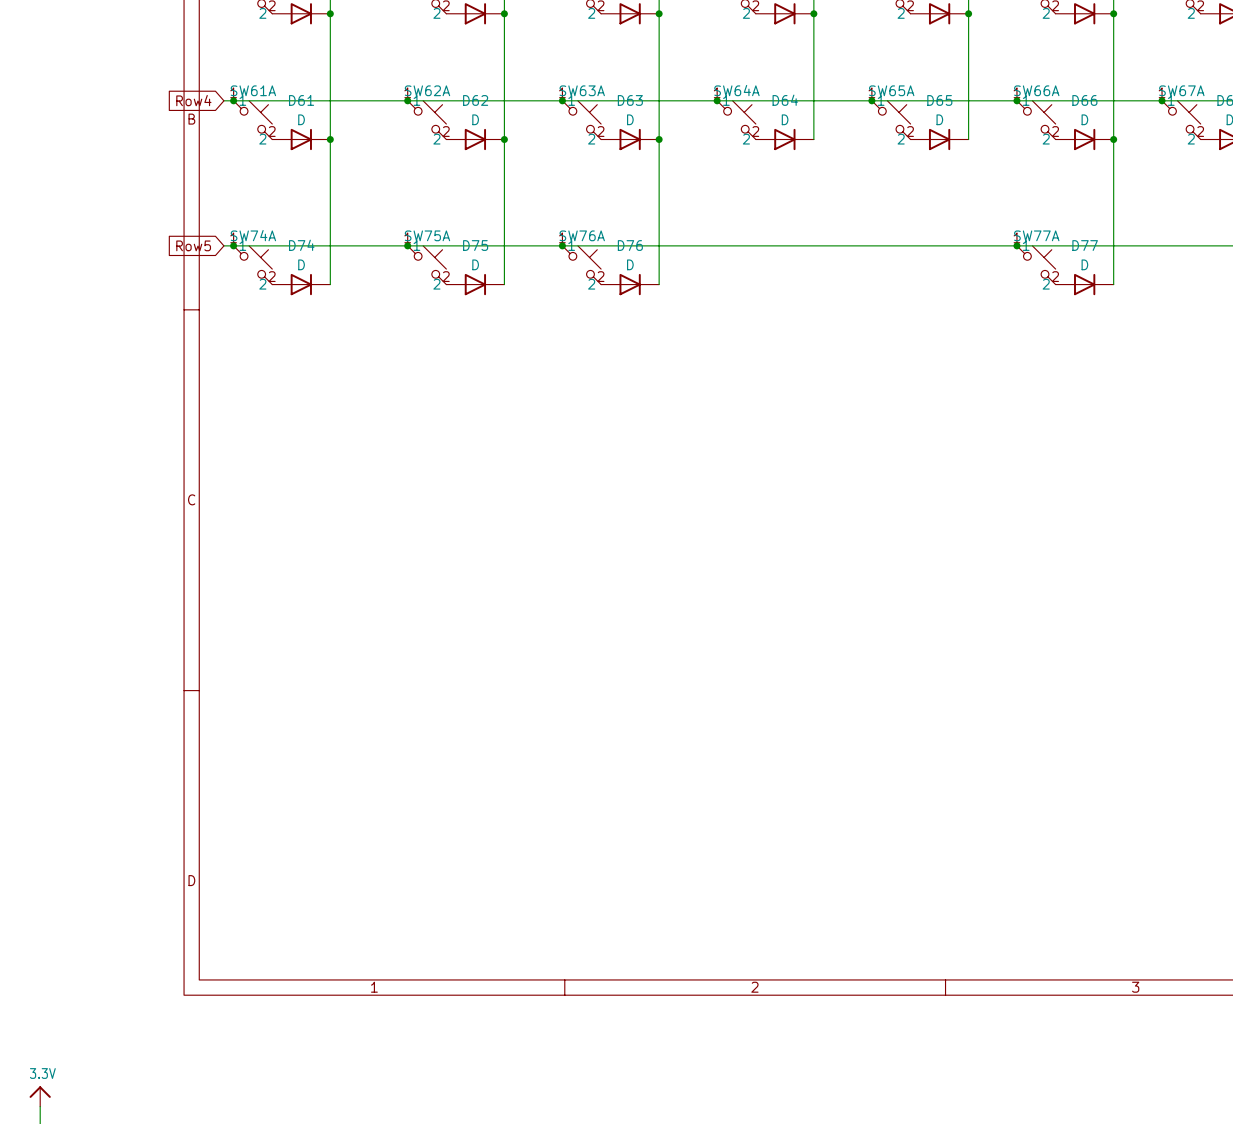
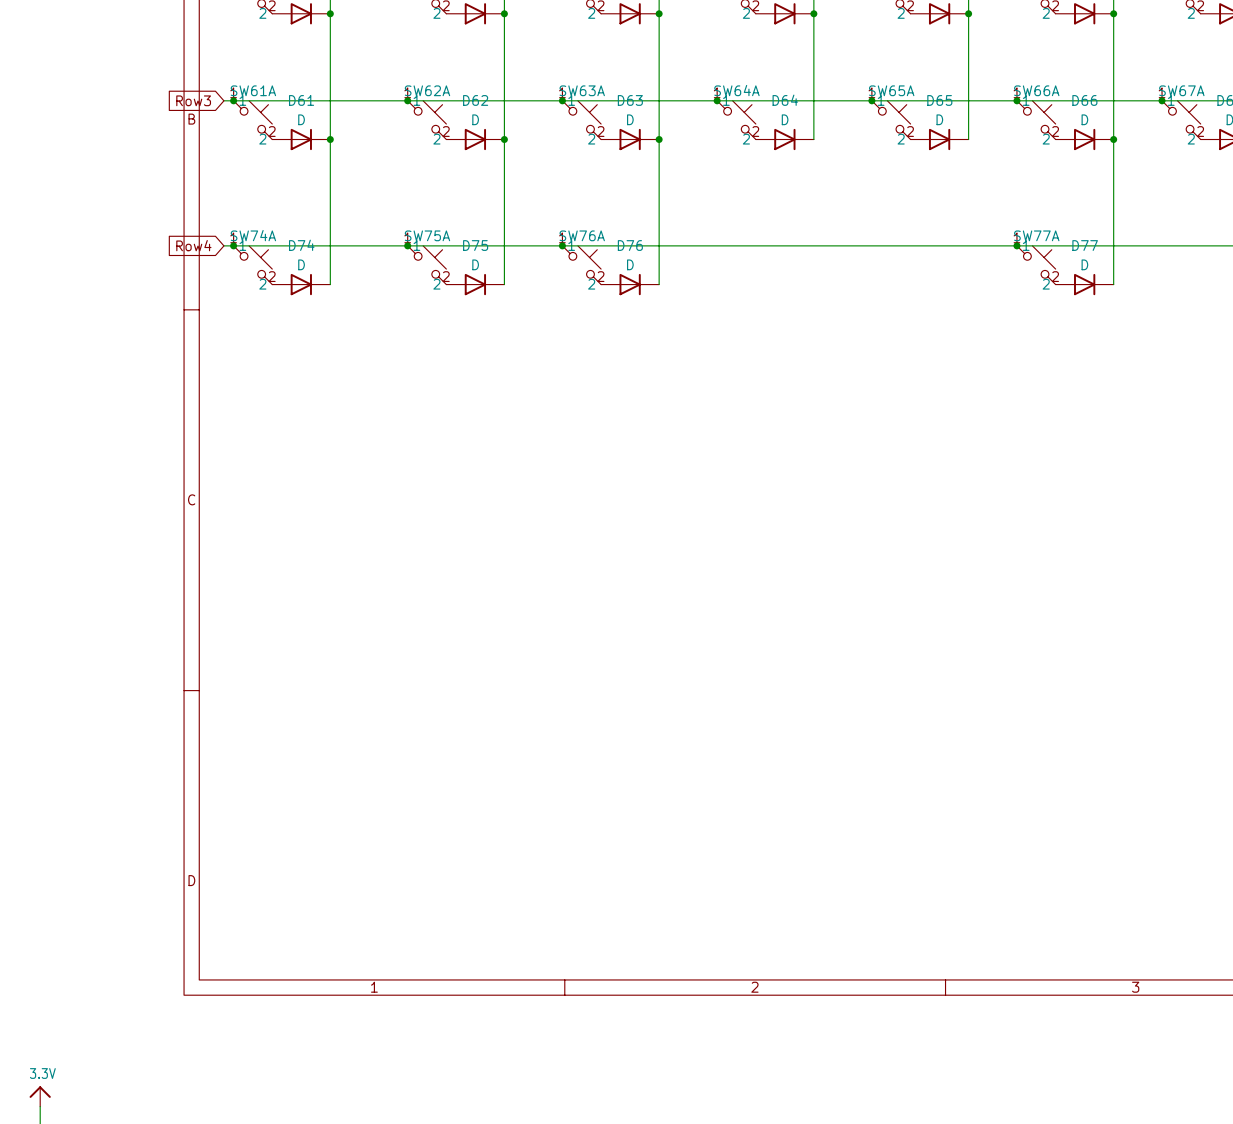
global label: Row4 (193, 100) -> Row3 (193, 100)
global label: Row5 (193, 245) -> Row4 (193, 245)

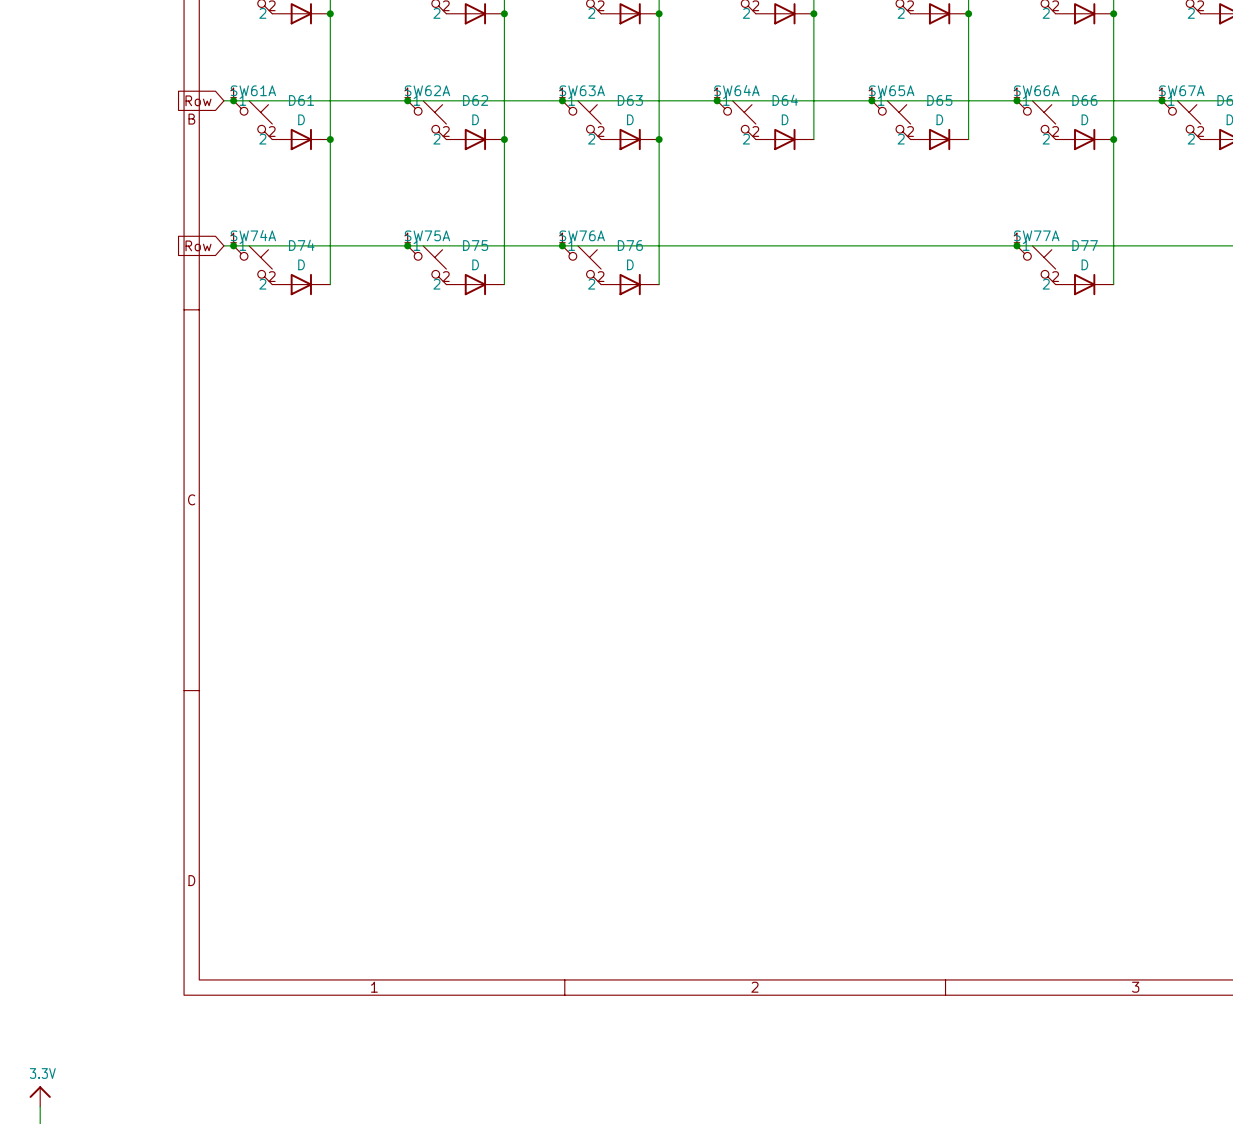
global label: Row3 (193, 100) -> Row (198, 100)
global label: Row4 (193, 245) -> Row (198, 245)

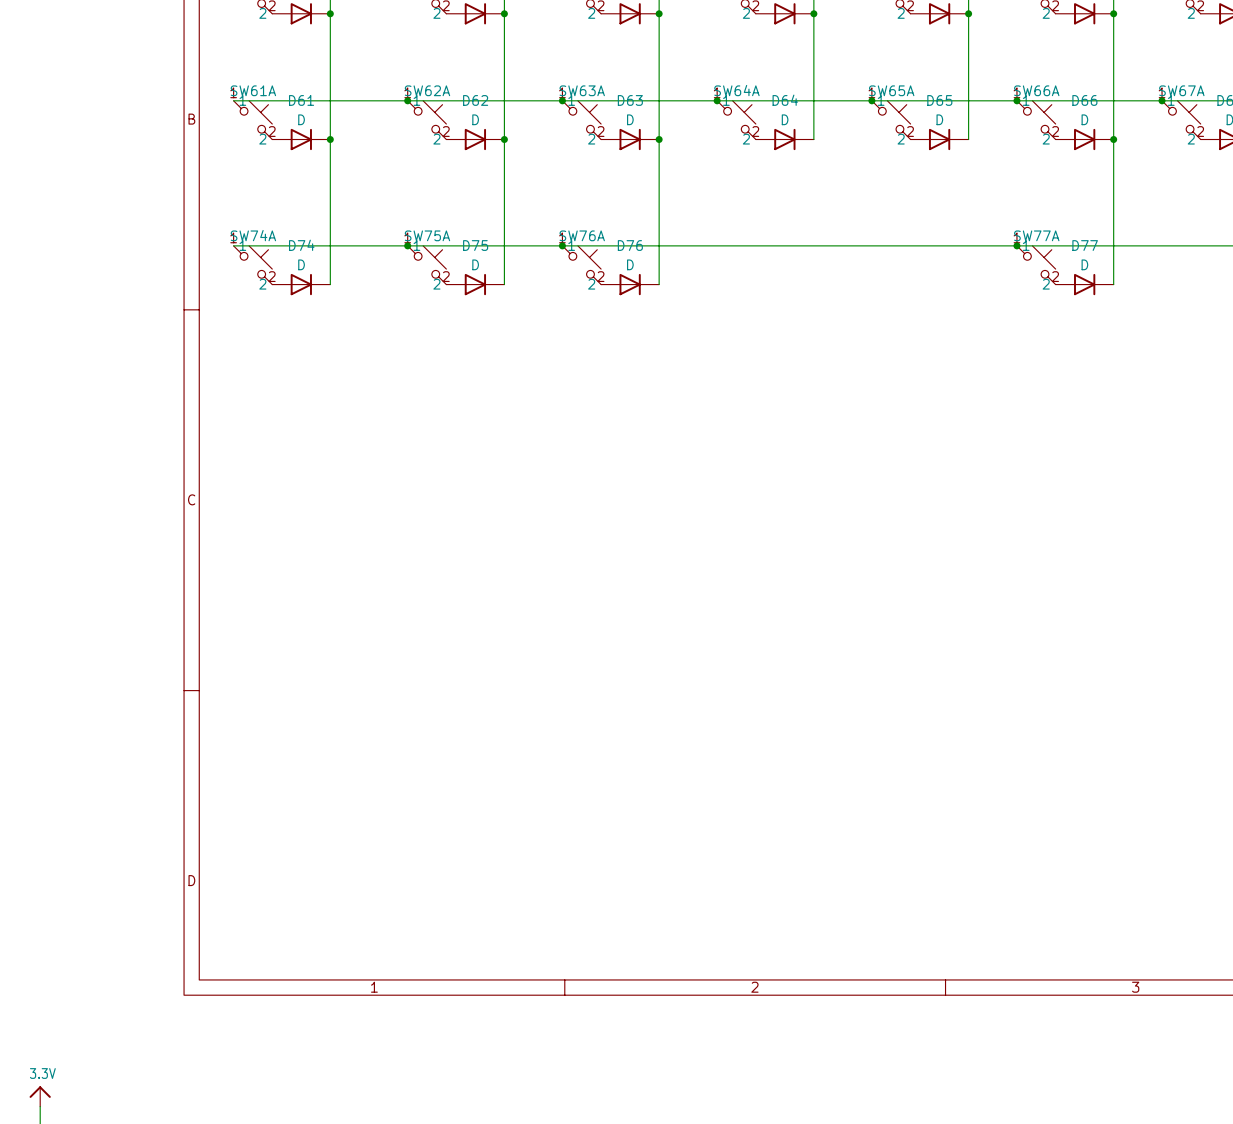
global label: Row (198, 100) -> none
wire: (223, 100) (233, 100) -> none
junction: (233, 100) -> none
global label: Row (198, 245) -> none
wire: (223, 245) (233, 245) -> none
junction: (233, 245) -> none

